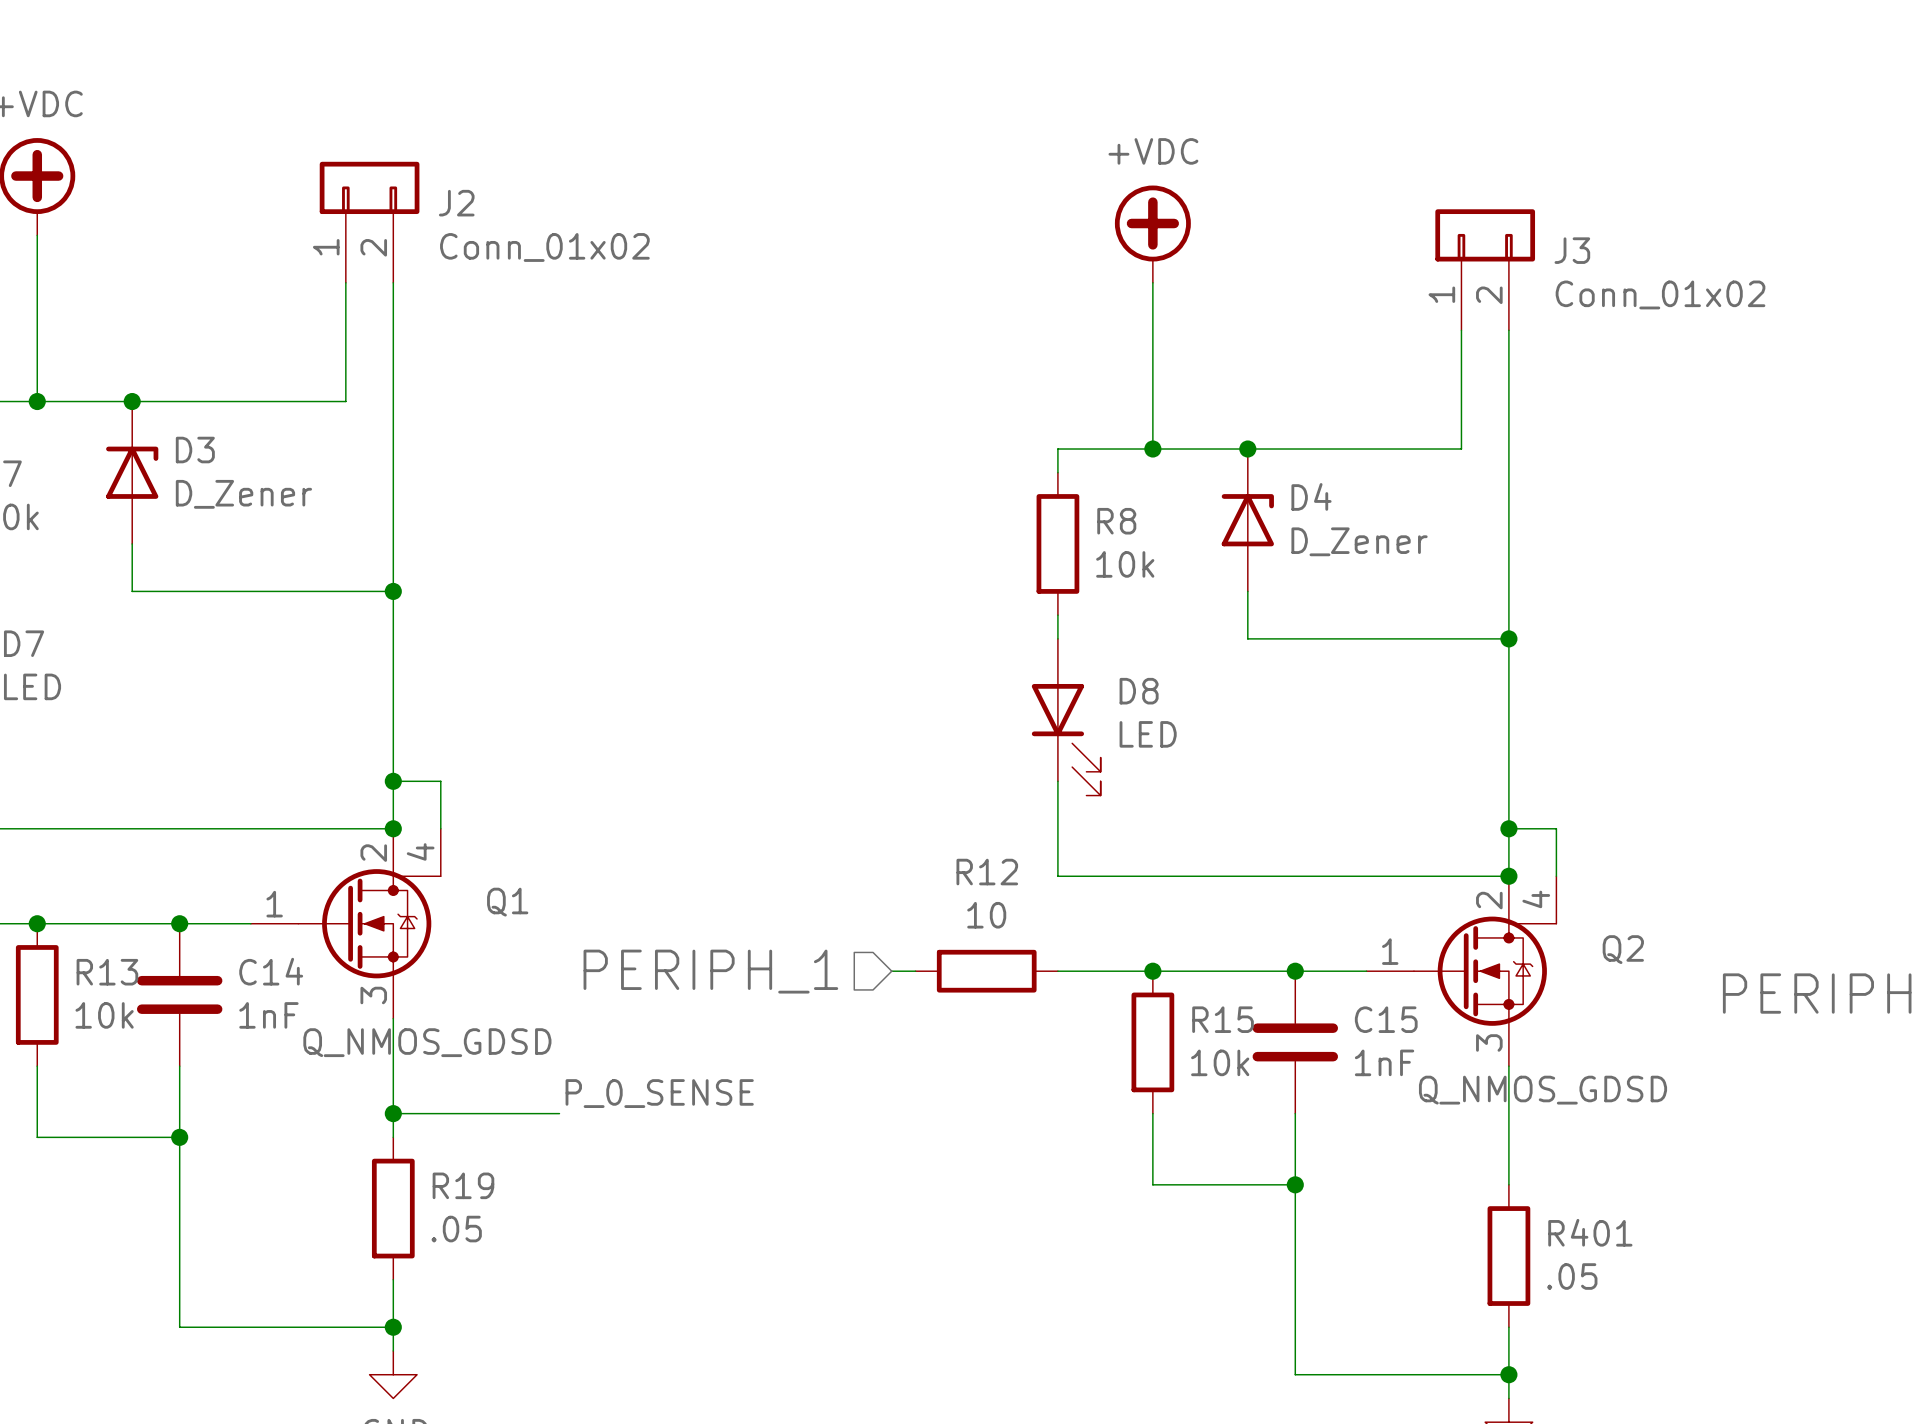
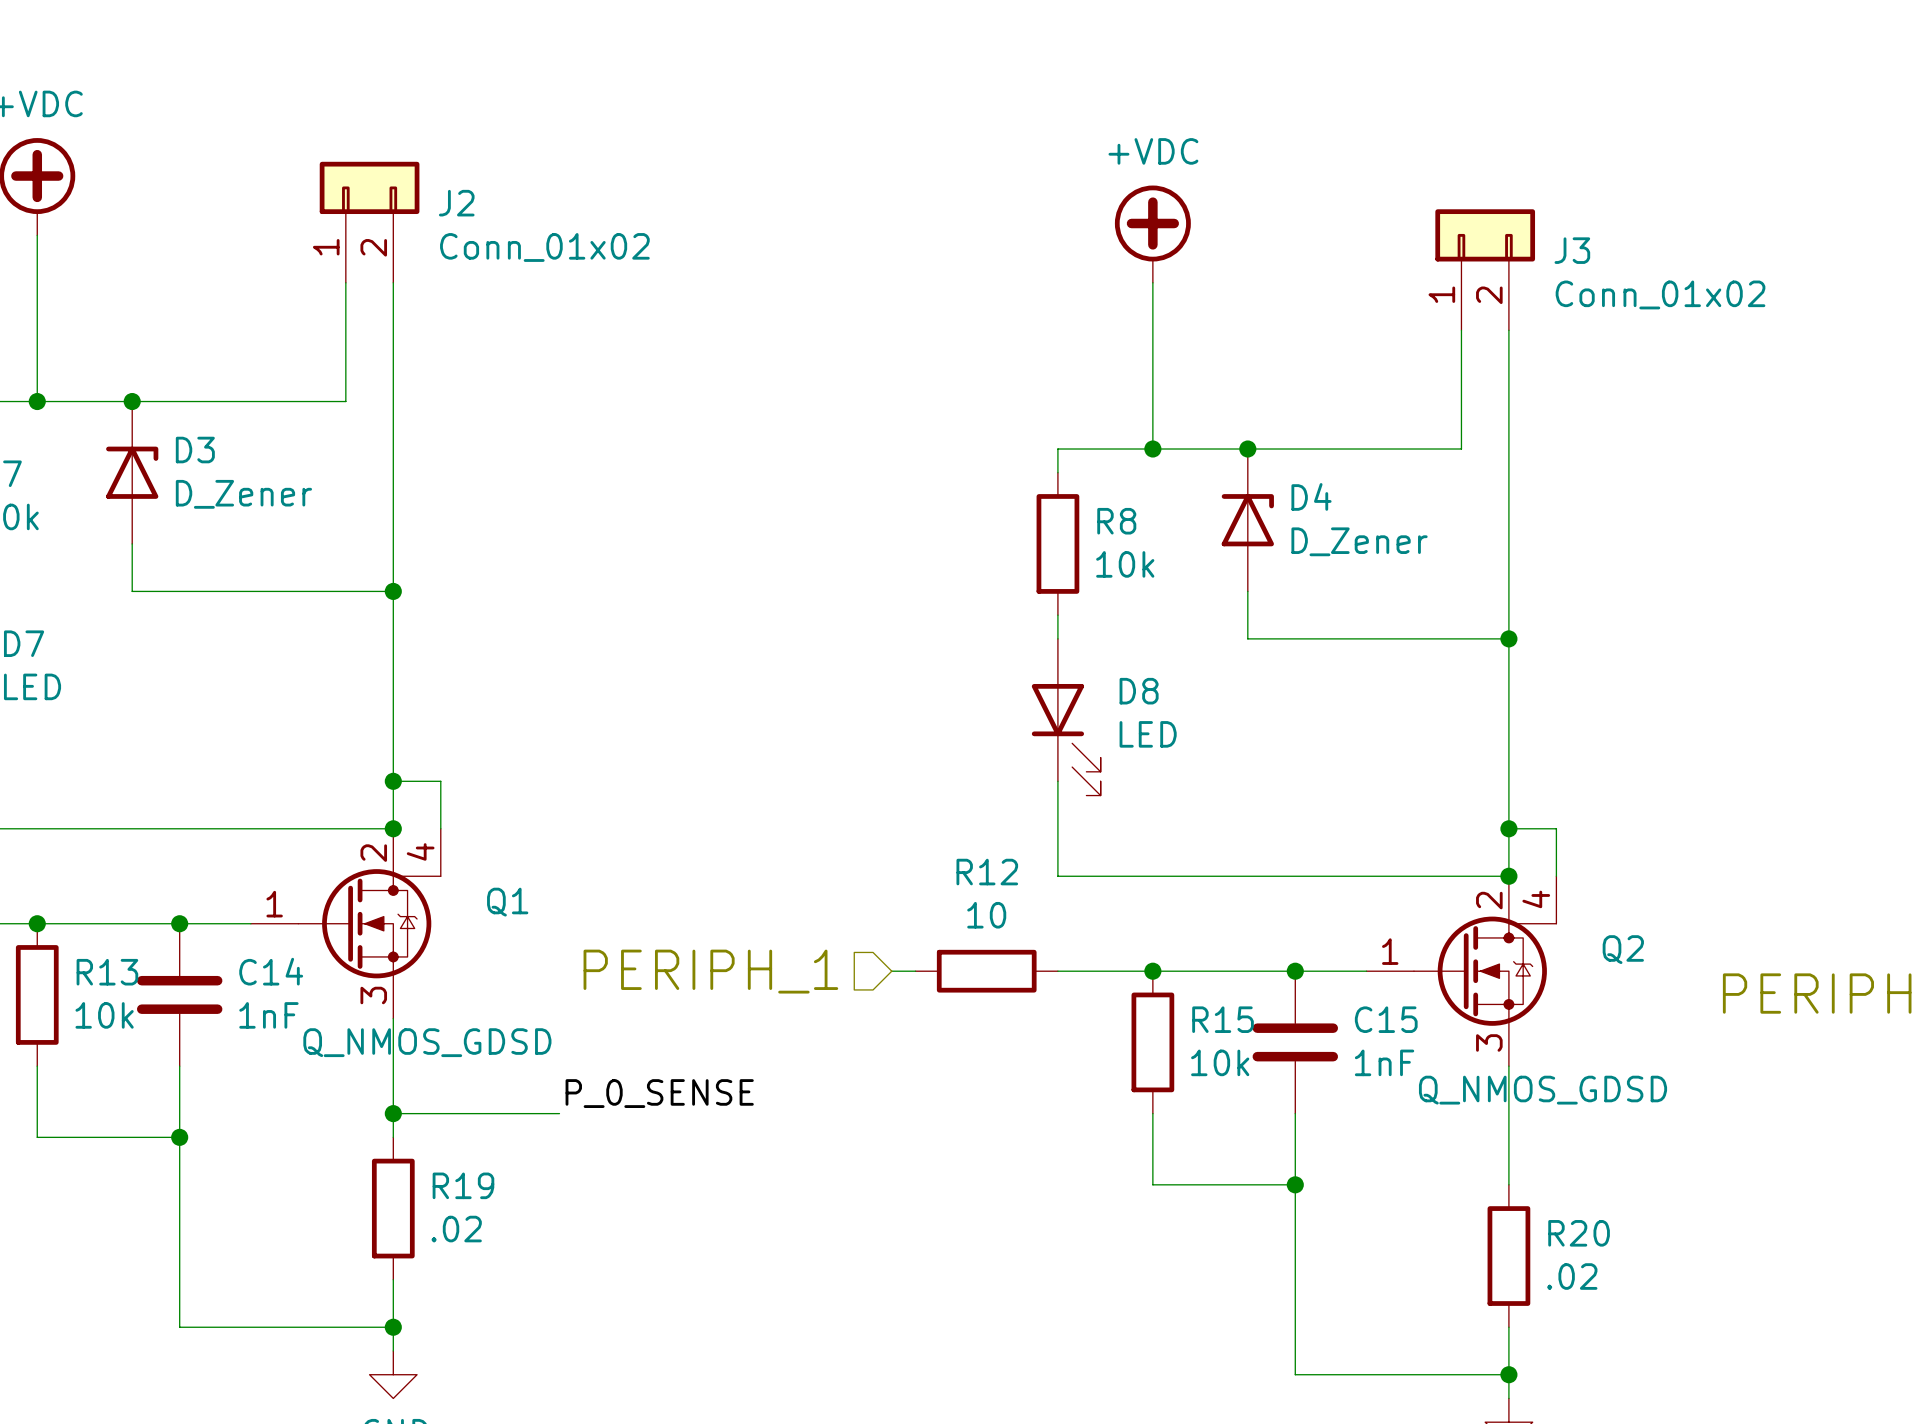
R19 value: .05 (456, 1229) -> .02 (456, 1229)
R401 name: R401 (1590, 1232) -> R20 (1579, 1233)
R401 value: .05 (1572, 1276) -> .02 (1572, 1276)

